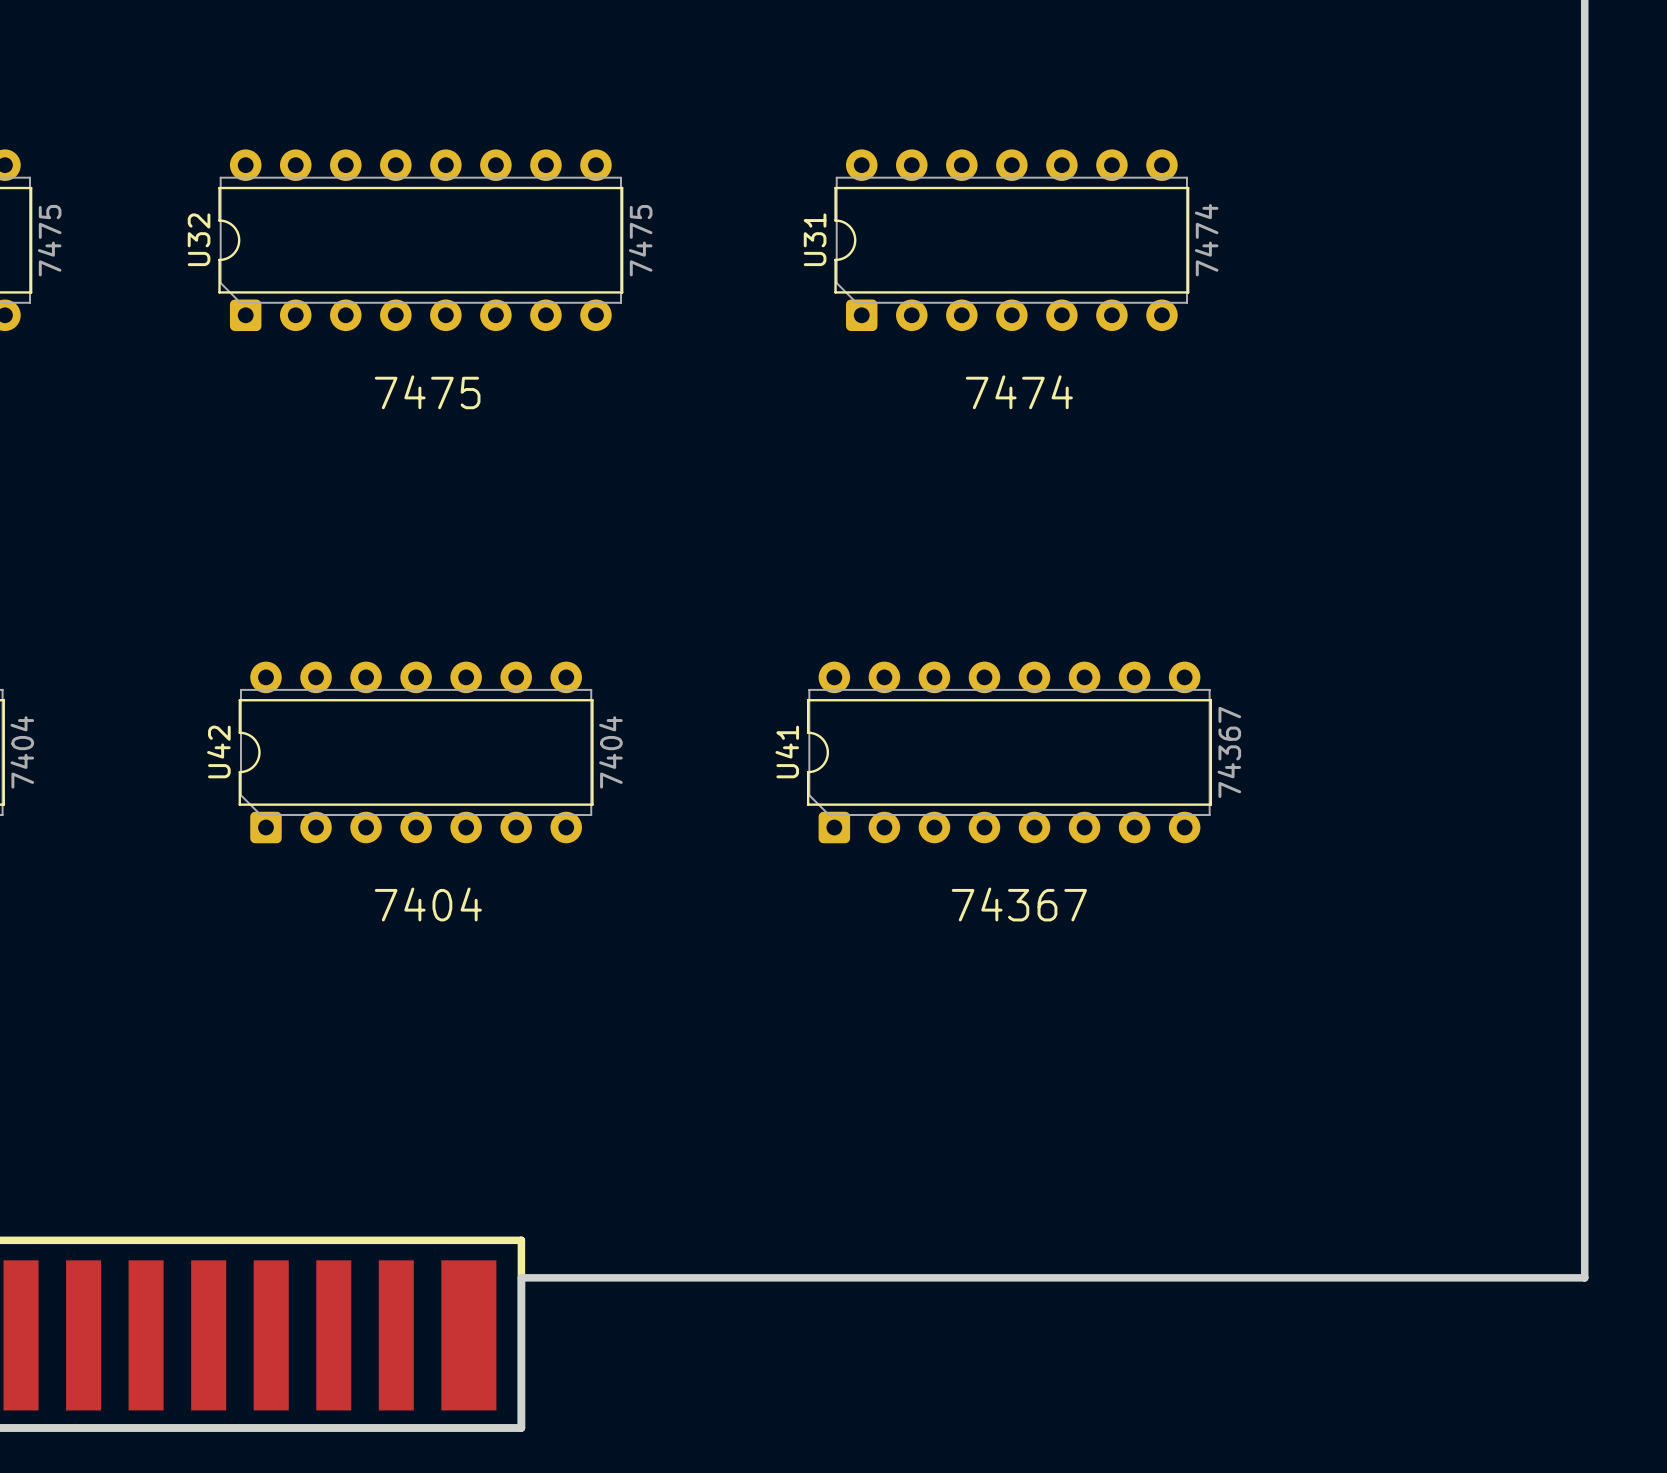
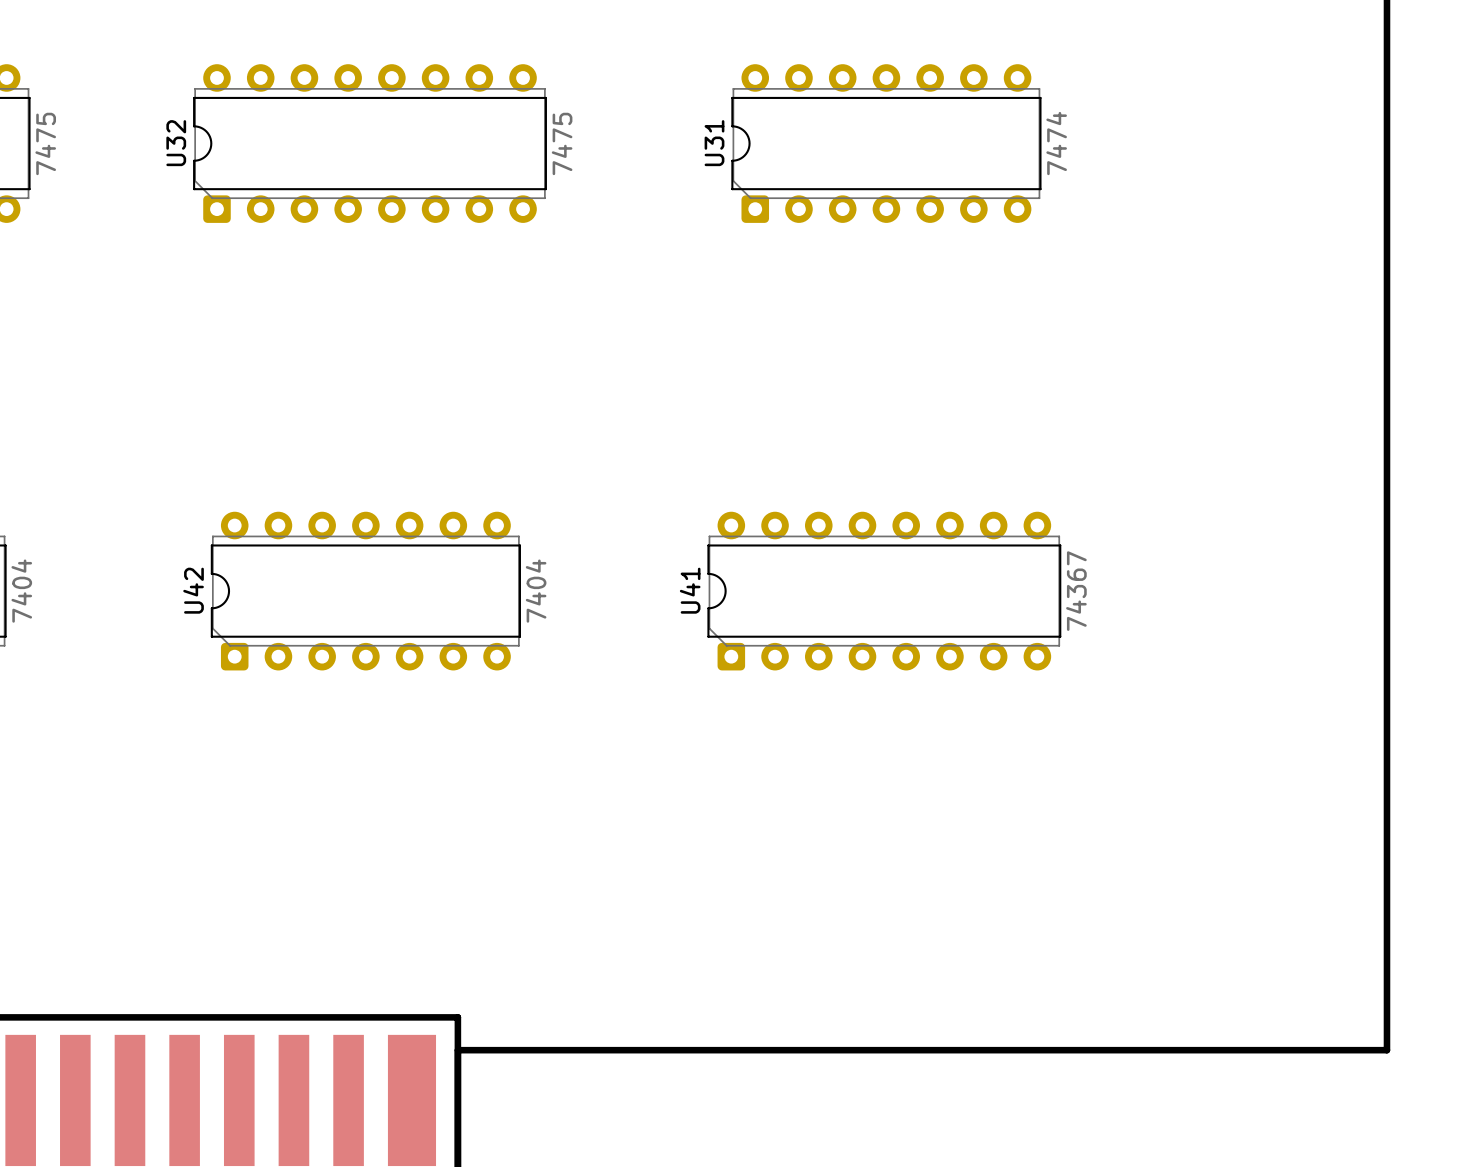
text: 7475 (427, 392) -> none
text: 7474 (1019, 392) -> none
text: 7404 (428, 904) -> none
text: 74367 (1019, 904) -> none

